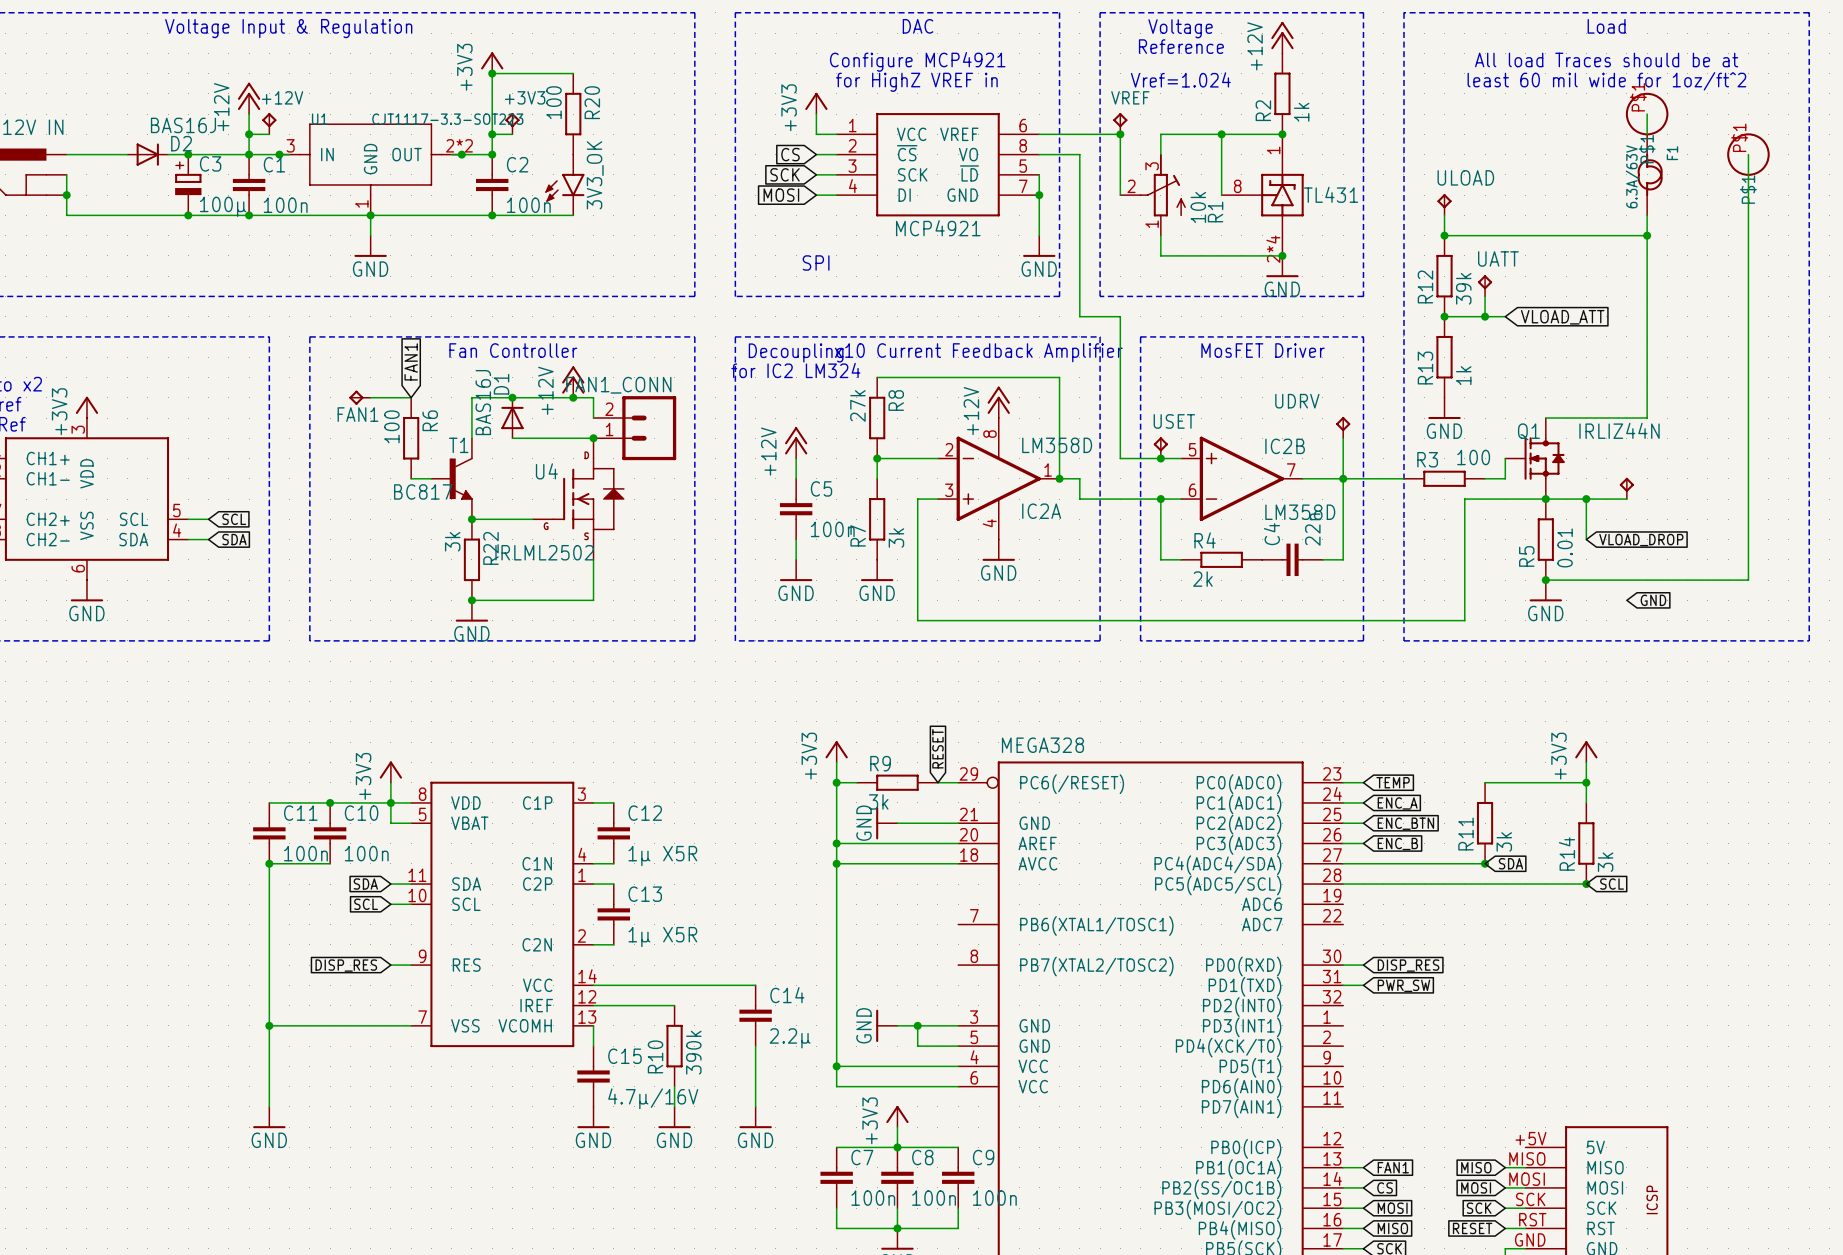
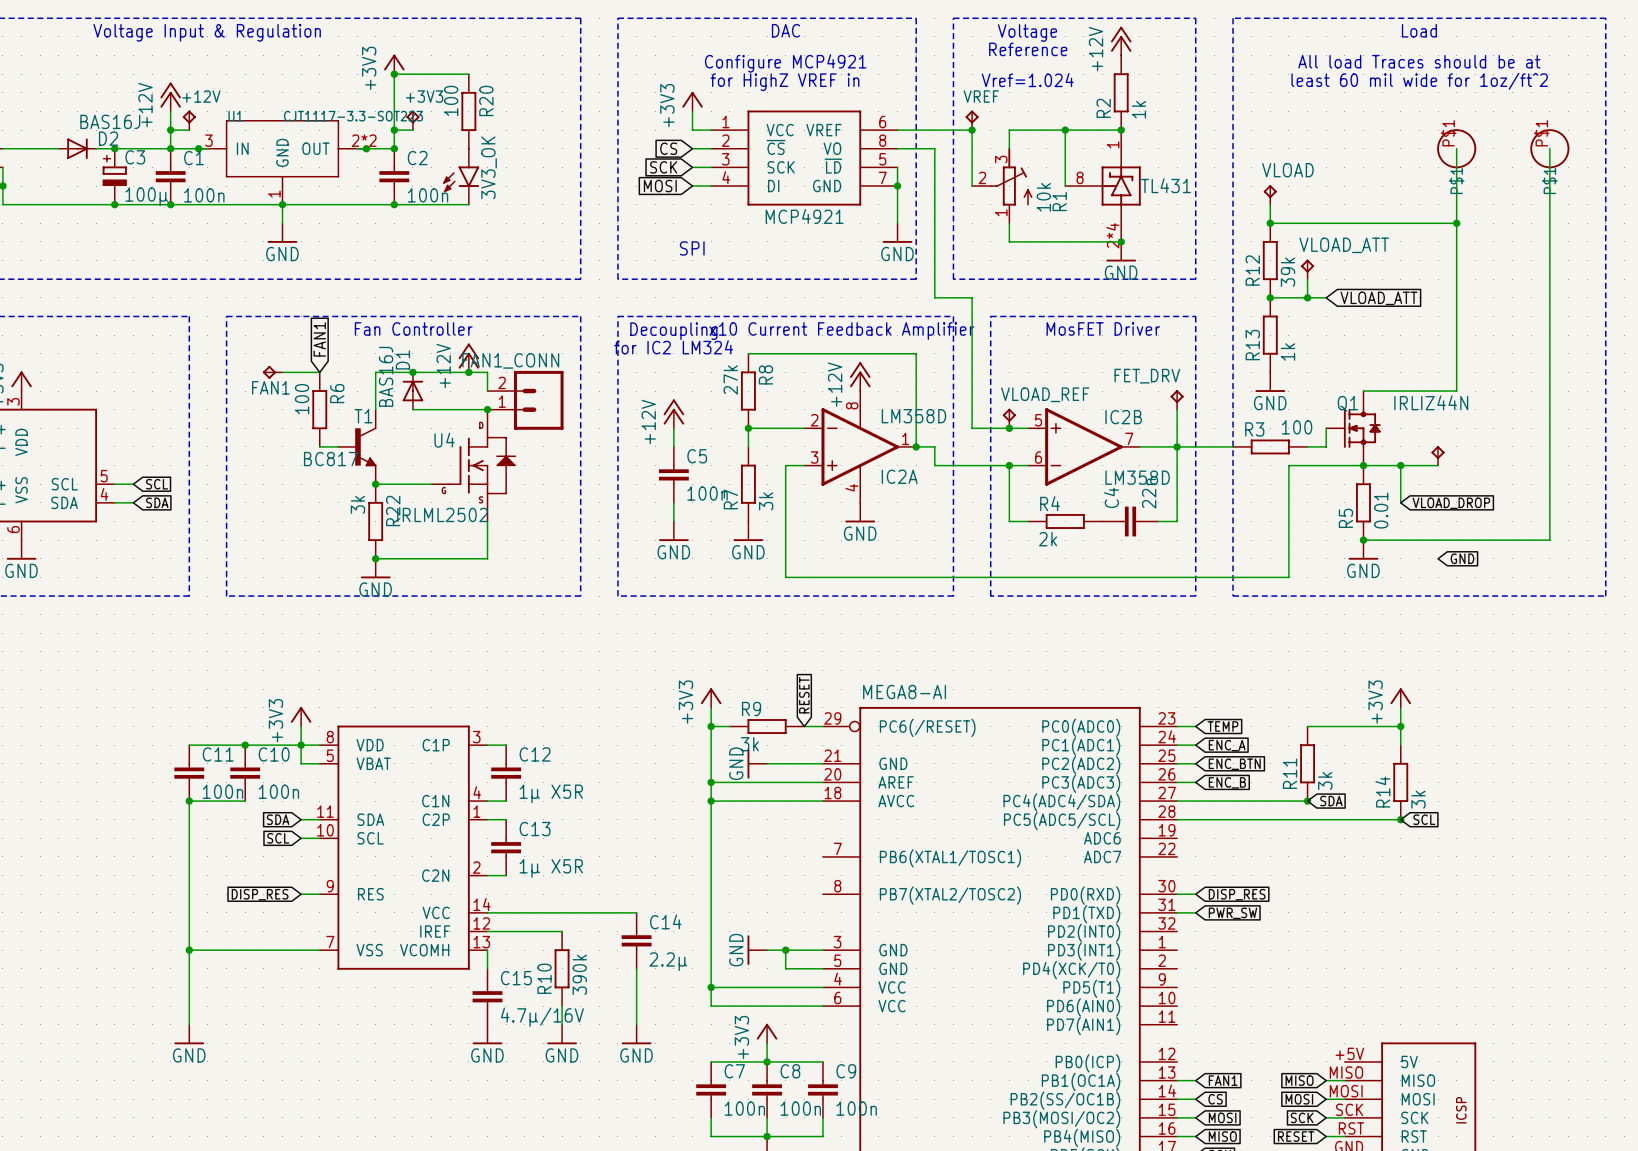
wire: (1647, 114) (1647, 134) -> none
part position: (1647, 114) -> (1456, 148)
F1: 6.3A/63V (1650, 174) -> none
ULOAD name: ULOAD (1465, 177) -> VLOAD (1287, 170)
UATT name: UATT (1498, 258) -> VLOAD_ATT (1344, 245)
UDRV name: UDRV (1297, 401) -> FET_DRV (1147, 376)
USET name: USET (1174, 421) -> VLOAD_REF (1045, 394)
part value: MEGA328 (1042, 745) -> MEGA8-AI (904, 692)

